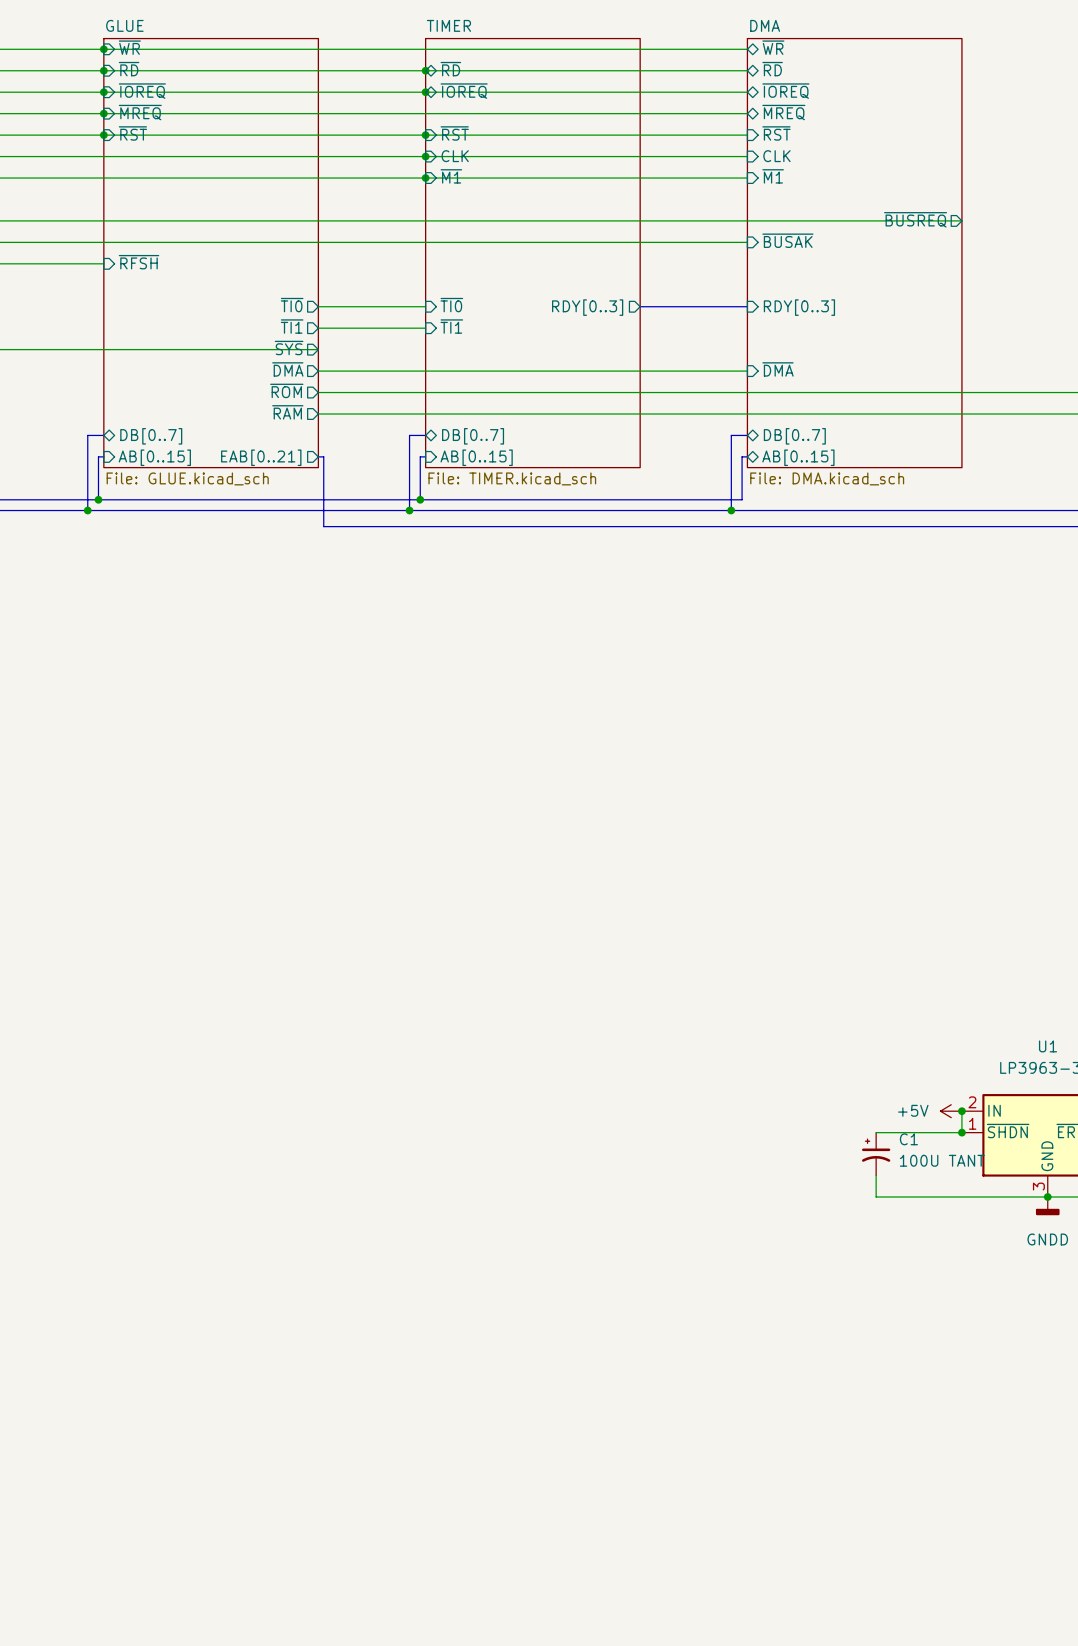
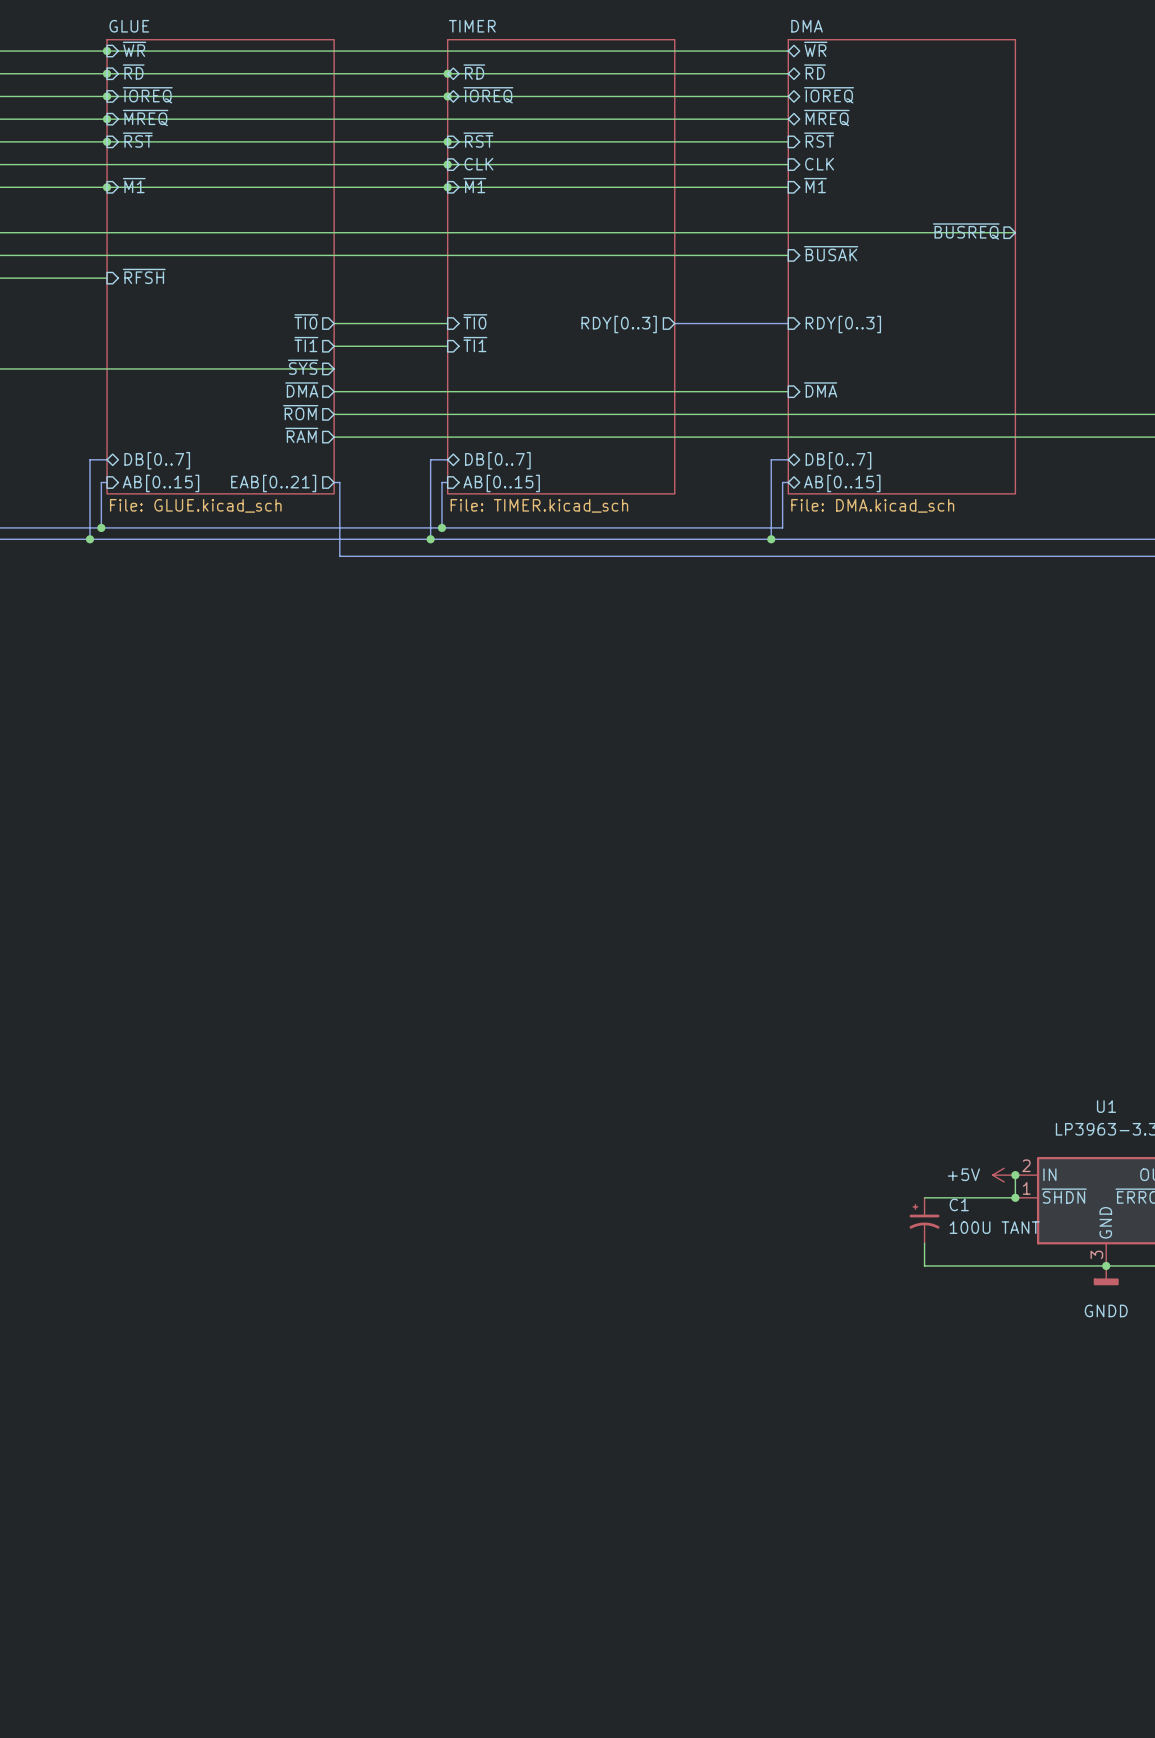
sheet pin: none -> ~{M1} (134, 185)
junction: none -> (107, 187)

